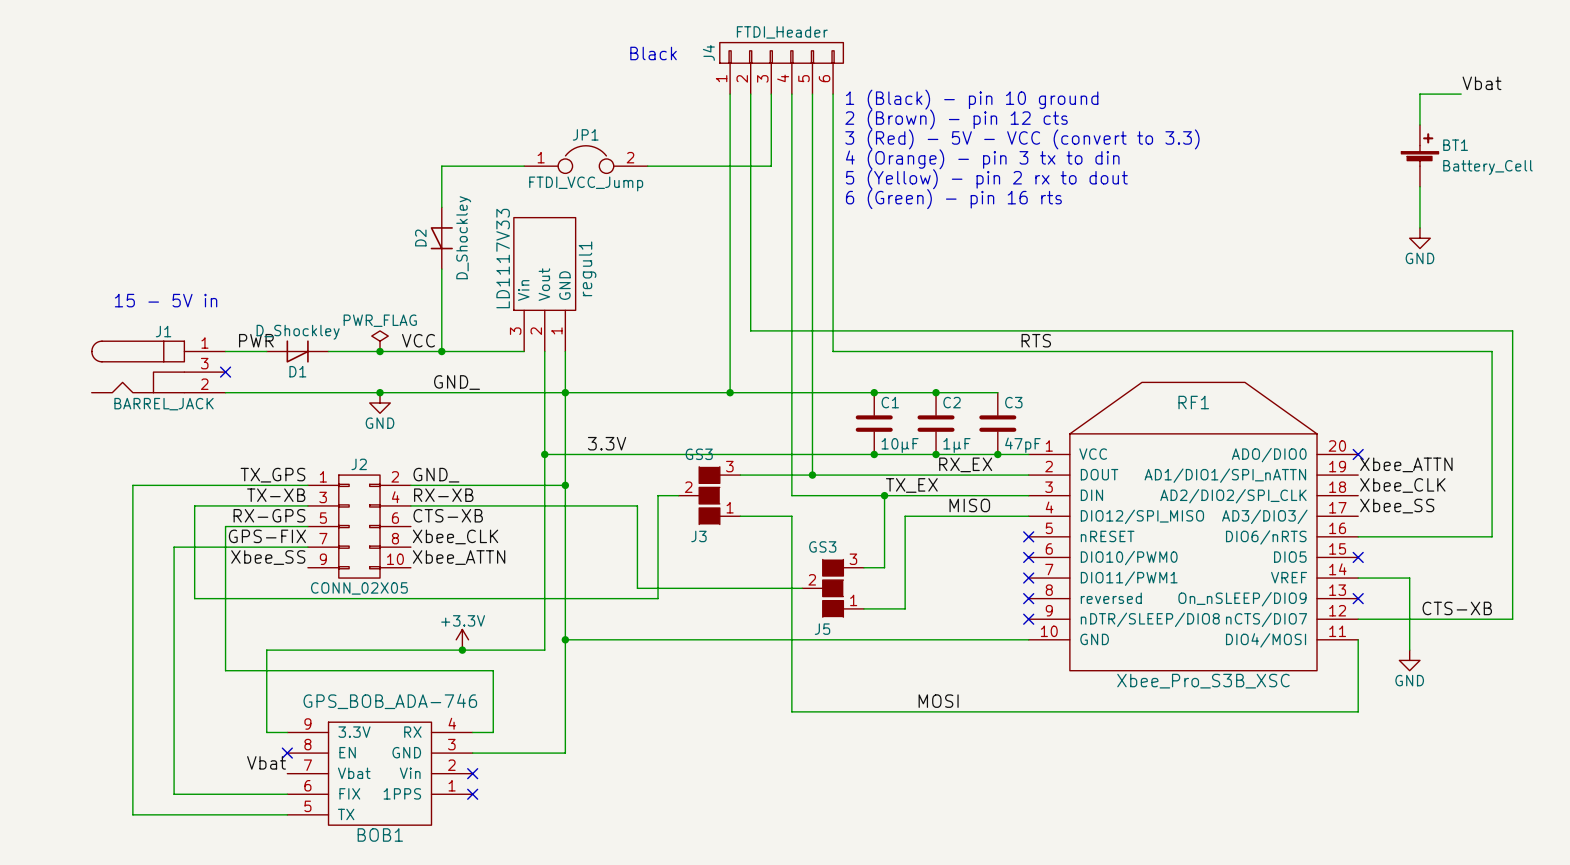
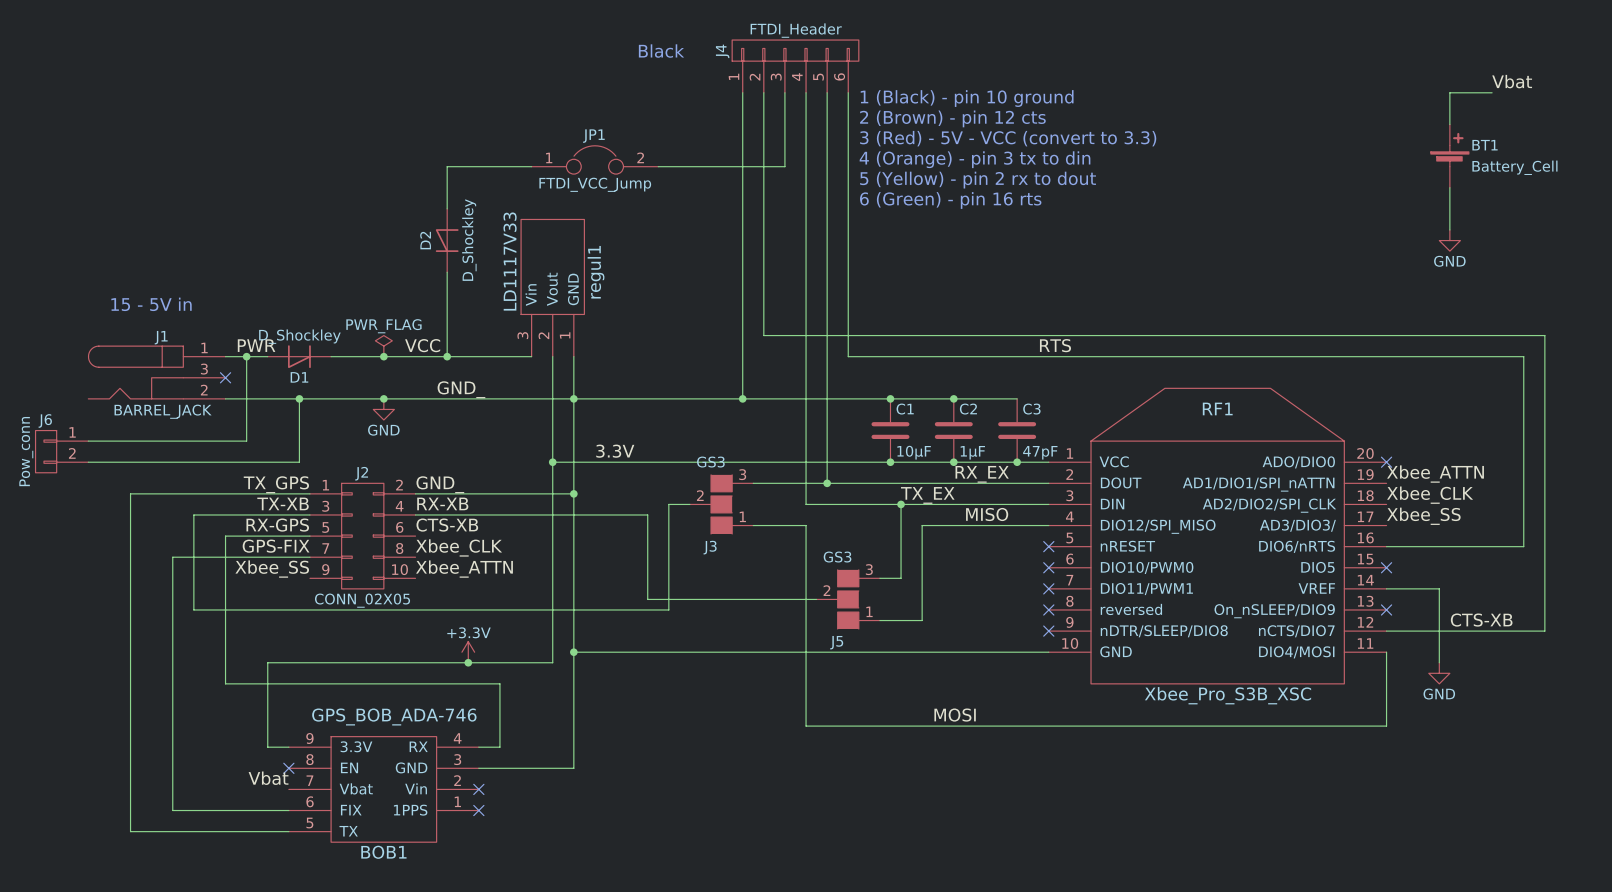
wire: none -> (246, 356) (246, 441) (88, 441)
junction: none -> (246, 356)
wire: none -> (299, 398) (299, 462) (88, 462)
junction: none -> (299, 398)
J6: none -> Pow_conn (61, 451)

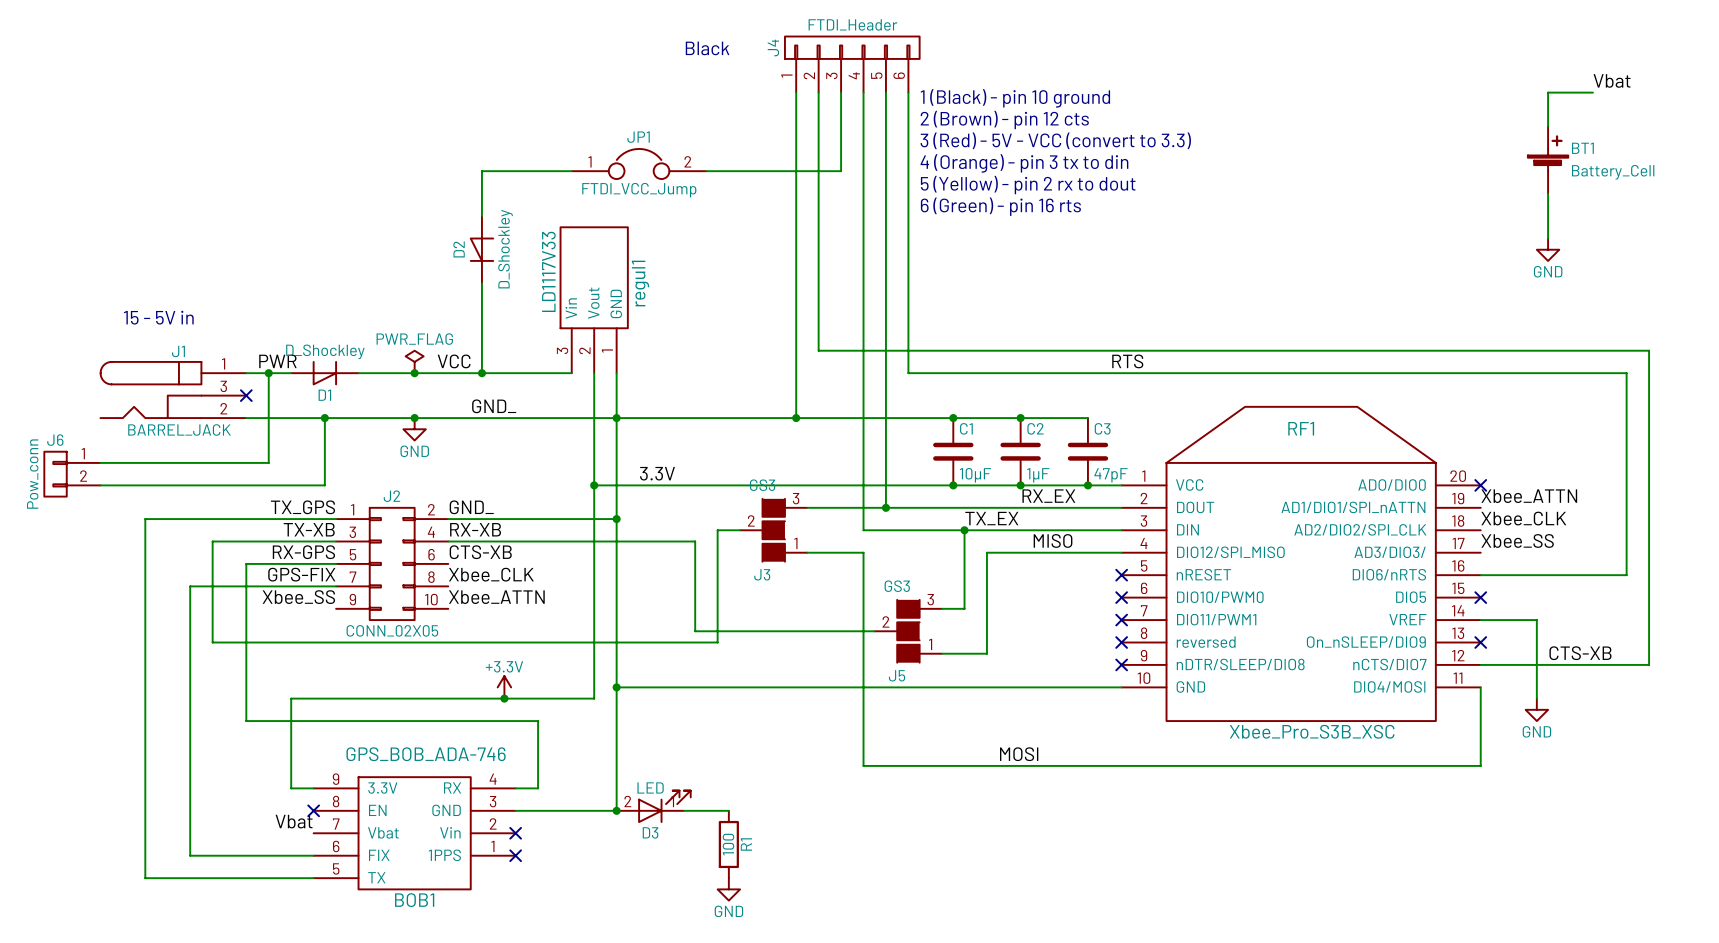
D3: none -> LED (653, 806)
junction: none -> (616, 810)
wire: none -> (683, 810) (728, 810)
R1: none -> 100 (728, 844)
power symbol: none -> GND (728, 889)

